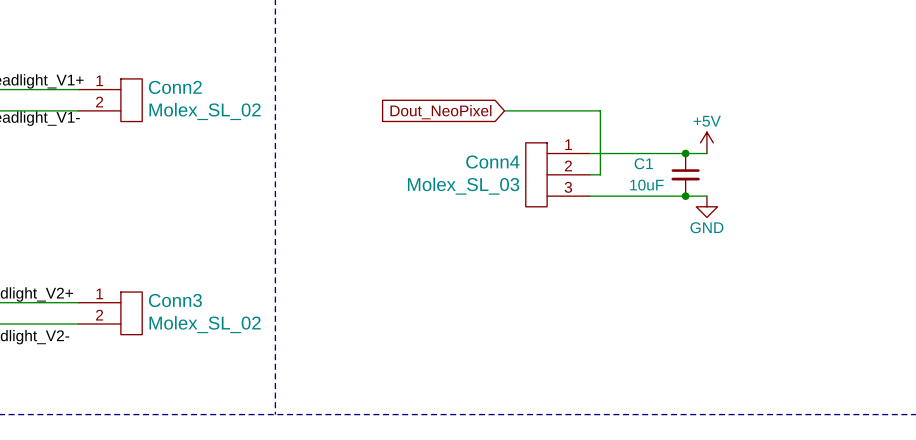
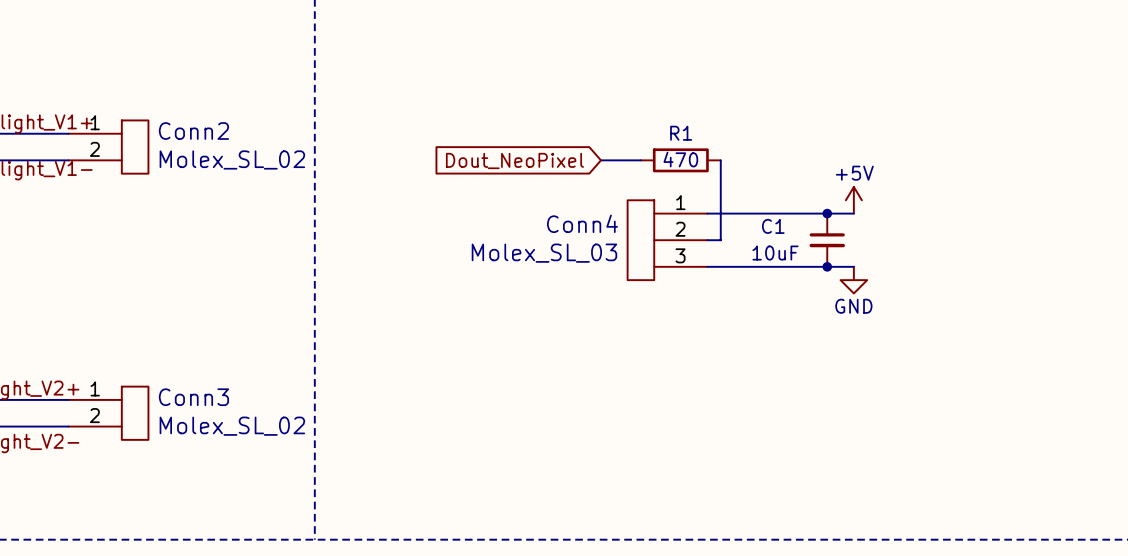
wire: (536, 110) (600, 110) -> none
R1: none -> 470 (680, 160)

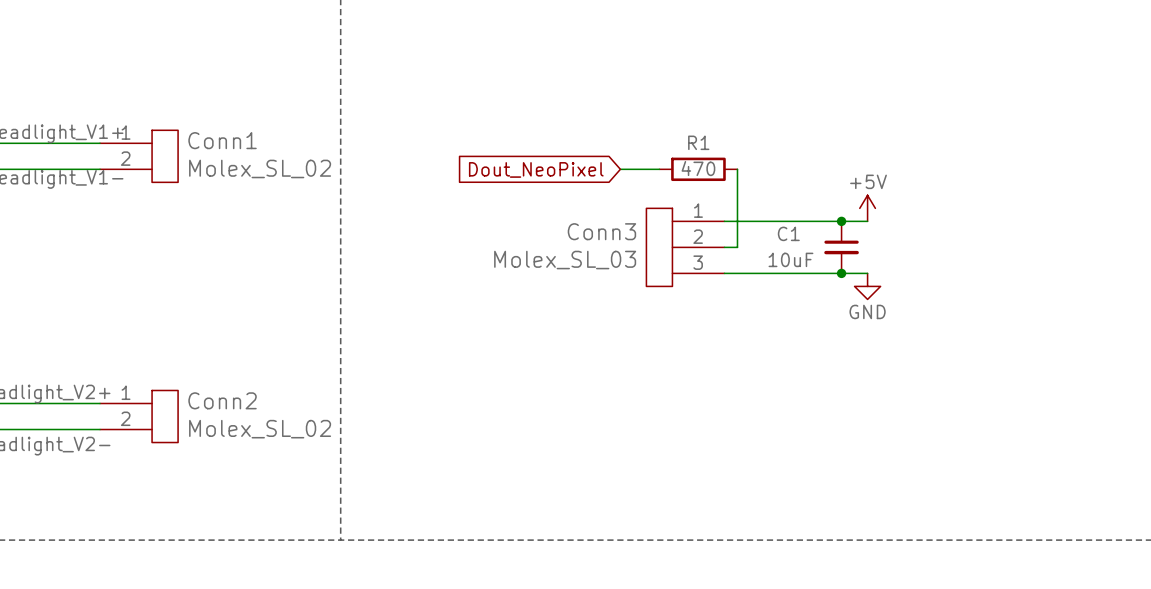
Conn2 name: Conn2 (193, 131) -> Conn1 (222, 140)
Conn4 name: Conn4 (582, 223) -> Conn3 (601, 231)
Conn3 name: Conn3 (193, 397) -> Conn2 (222, 400)

